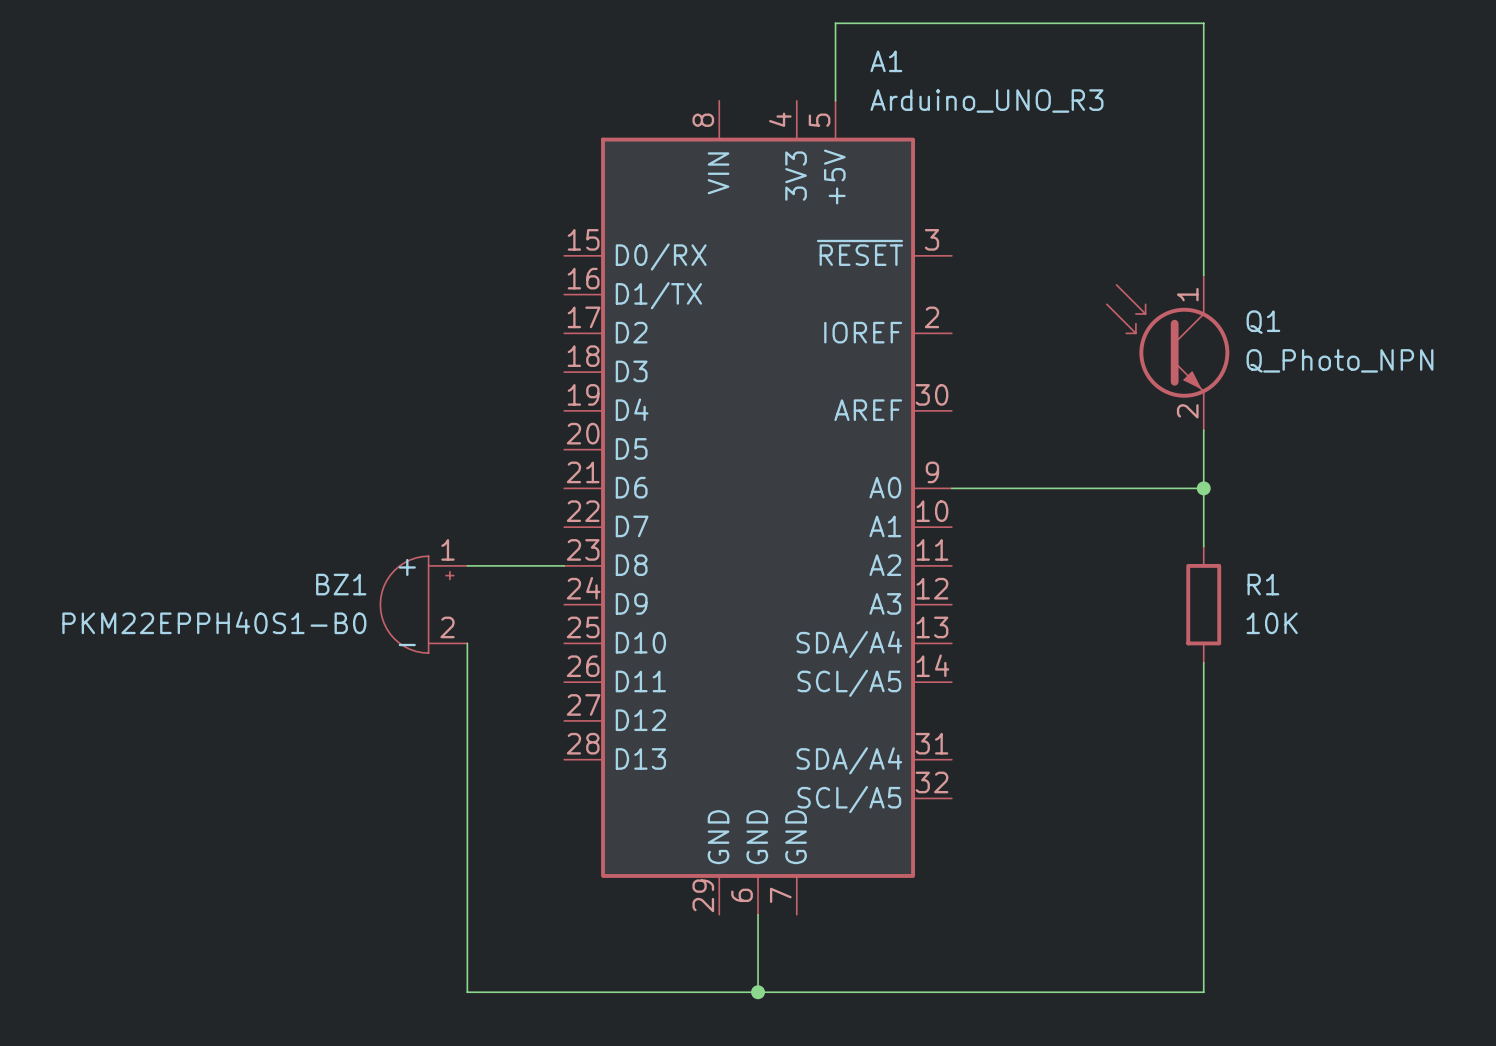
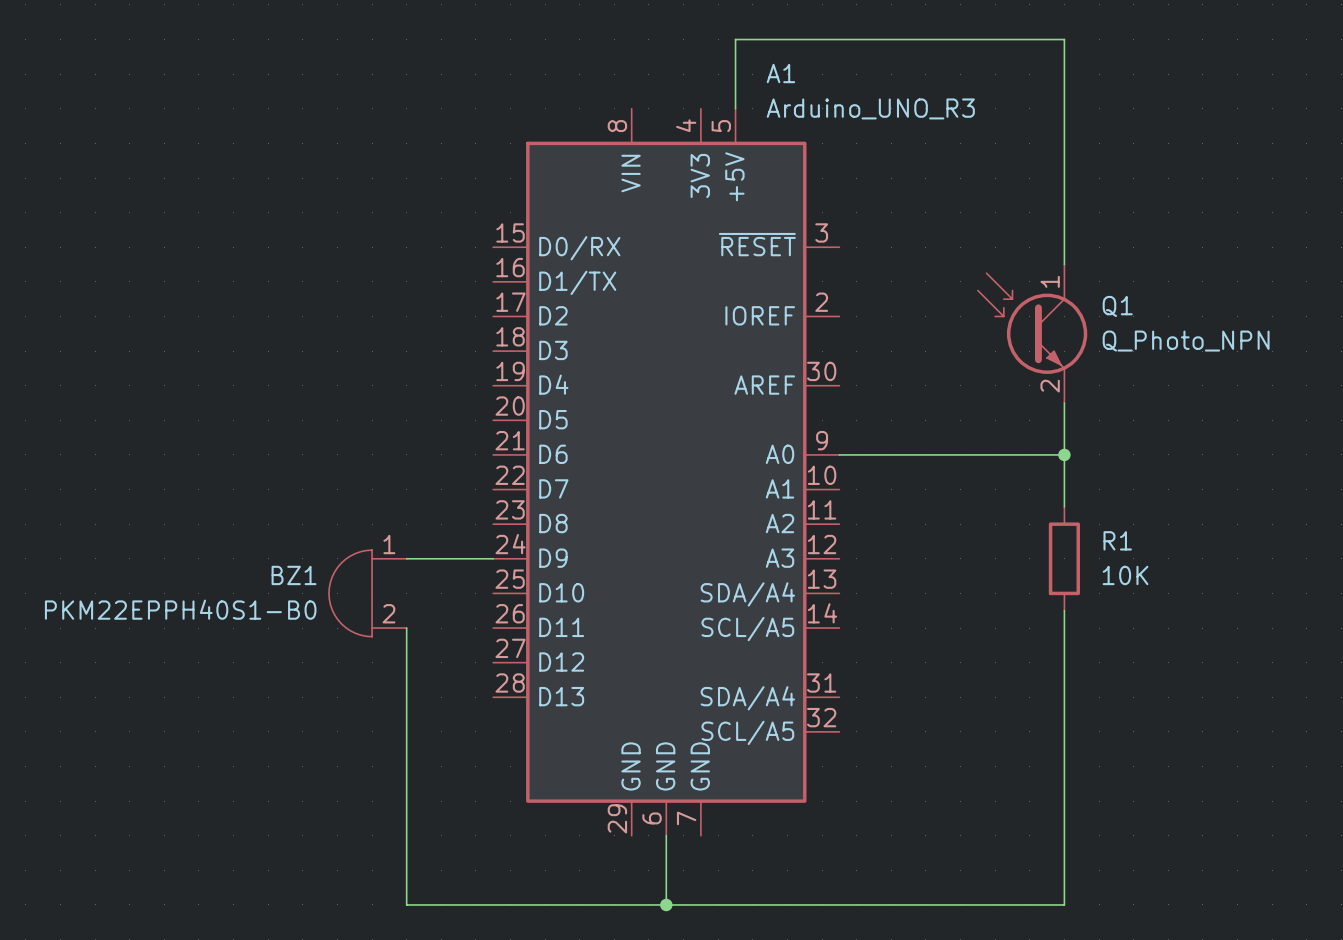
BZ1 symbol: [380, 556, 468, 654] -> [328, 550, 407, 637]
wire: (467, 565) (564, 565) -> (406, 558) (493, 558)
wire: (467, 643) (467, 682) -> none

